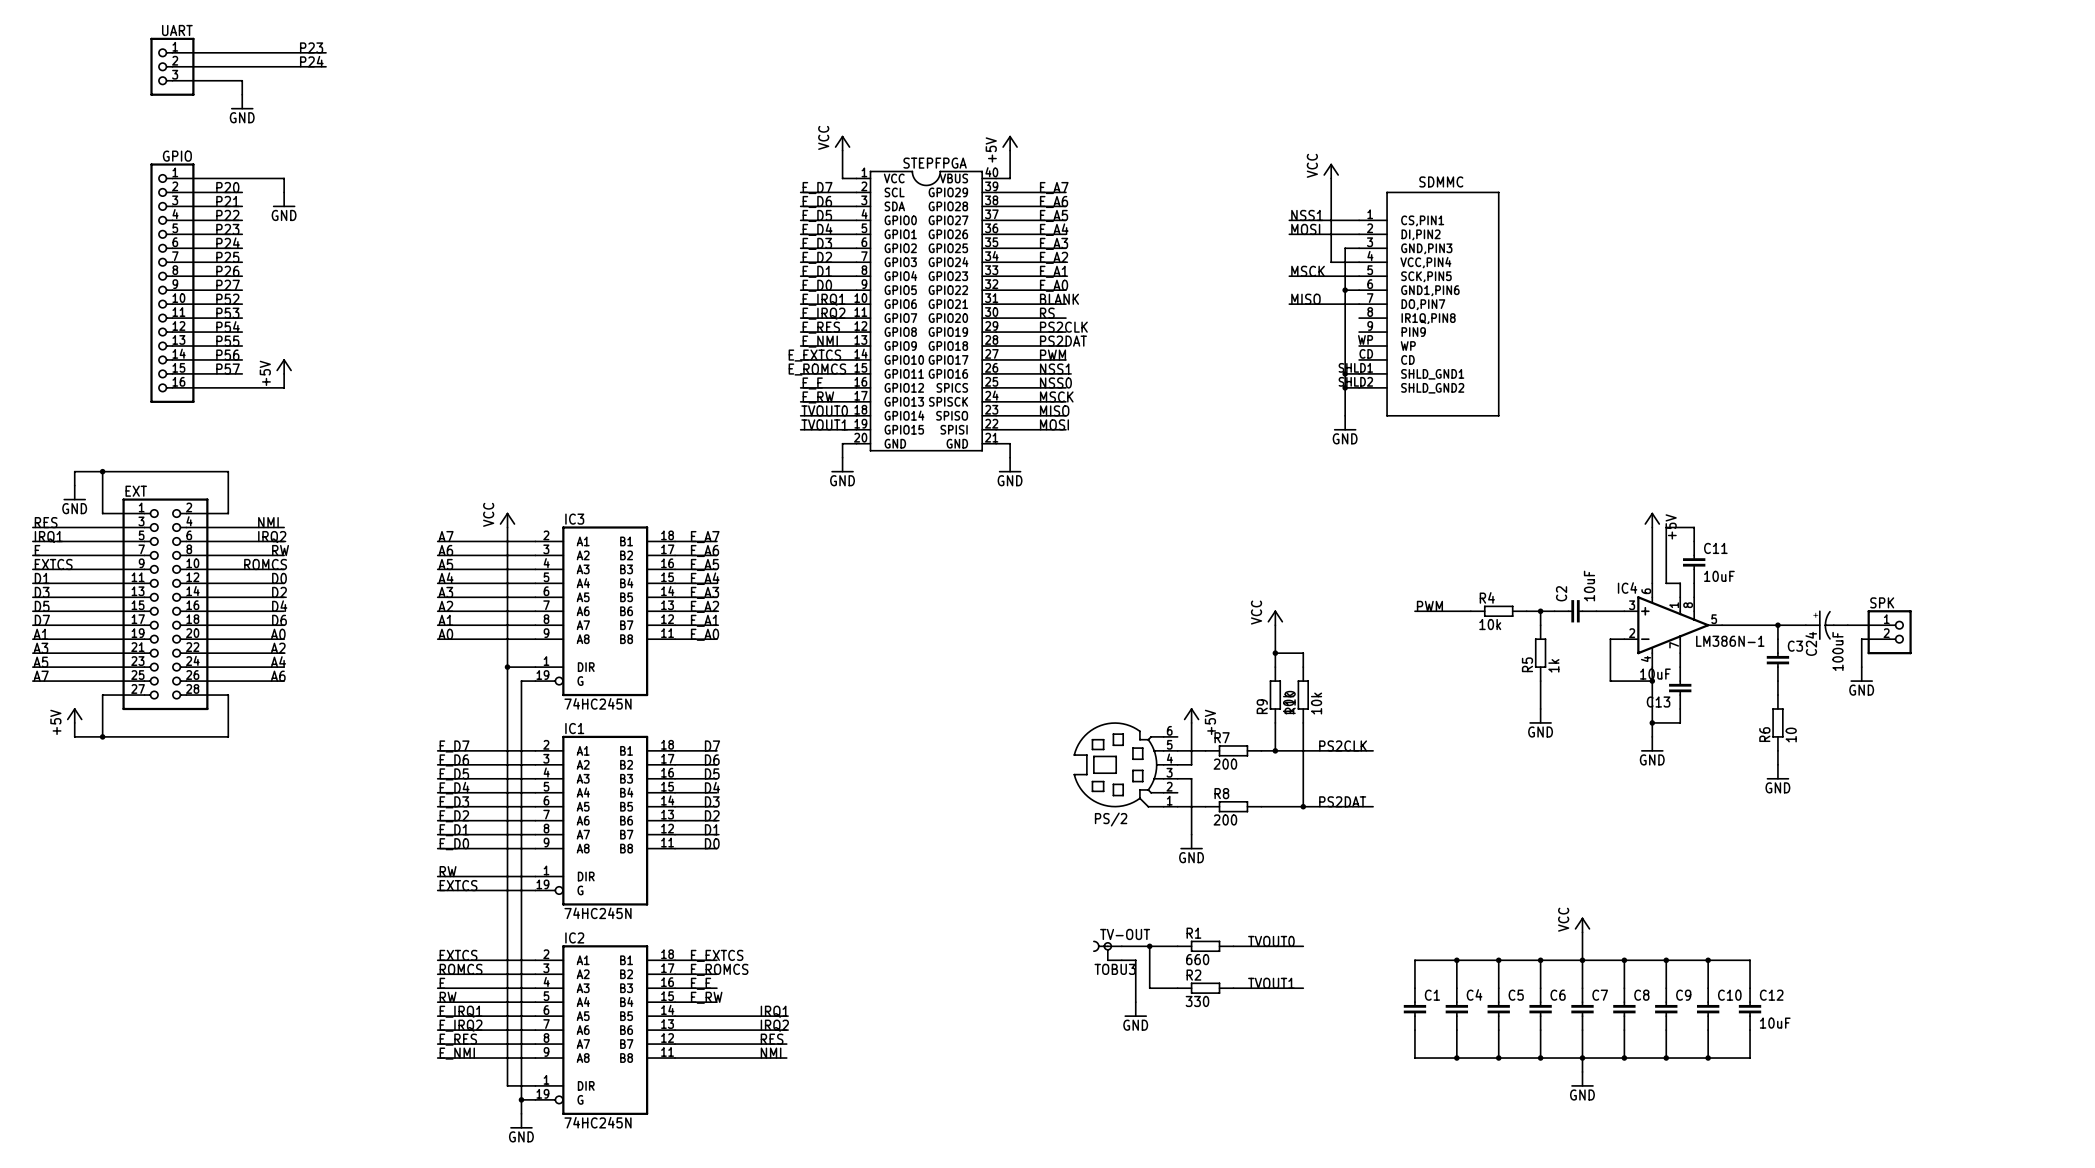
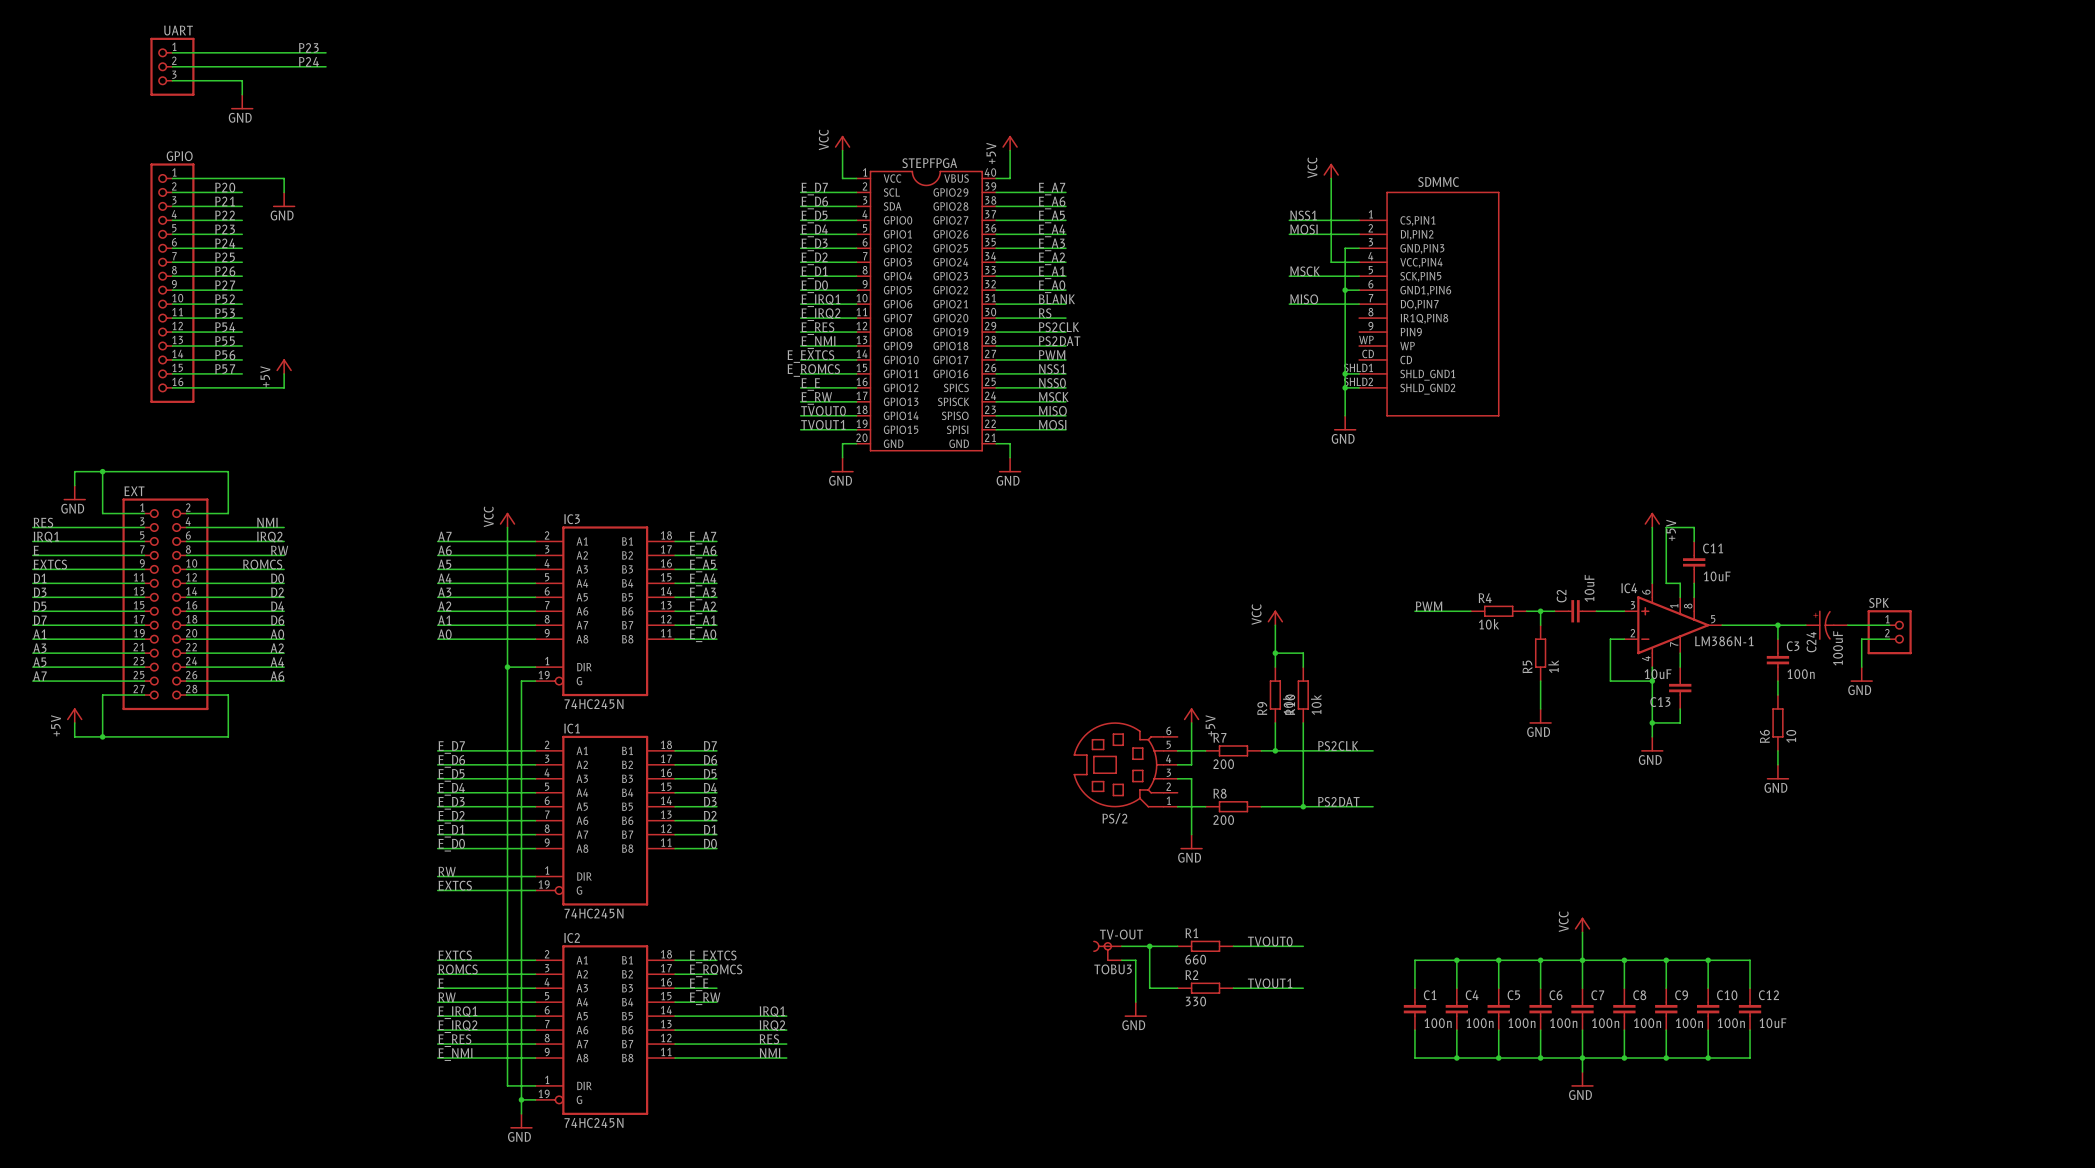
C3 value: none -> 100n (1801, 674)
C1 value: none -> 100n (1438, 1023)
C4 value: none -> 100n (1479, 1023)
C5 value: none -> 100n (1521, 1023)
C6 value: none -> 100n (1563, 1023)
C7 value: none -> 100n (1605, 1023)
C8 value: none -> 100n (1647, 1023)
C9 value: none -> 100n (1689, 1023)
C10 value: none -> 100n (1731, 1023)

